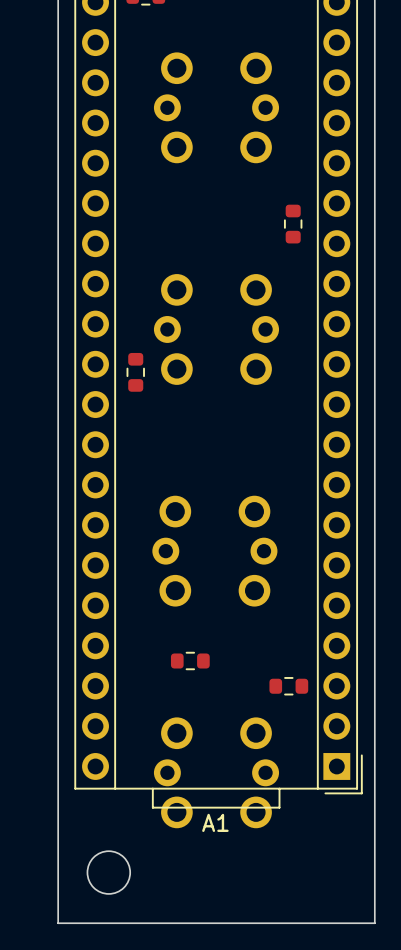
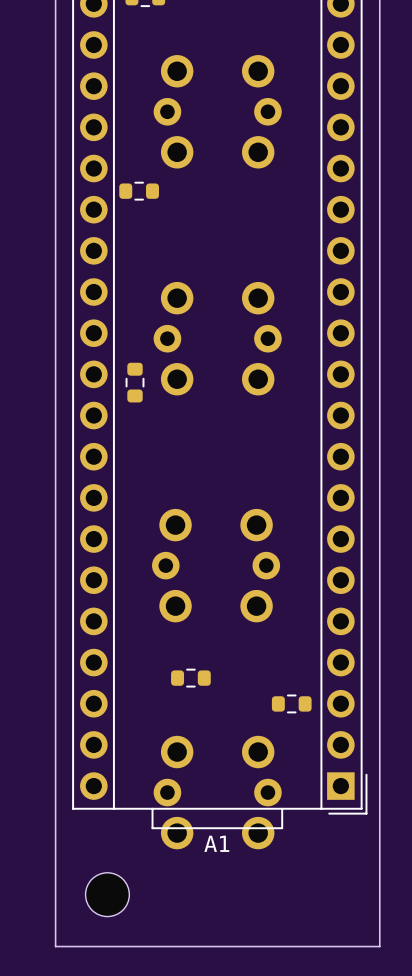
part rotation: 0° (293, 224) -> 90° clockwise (139, 191)
part position: (293, 224) -> (139, 191)

